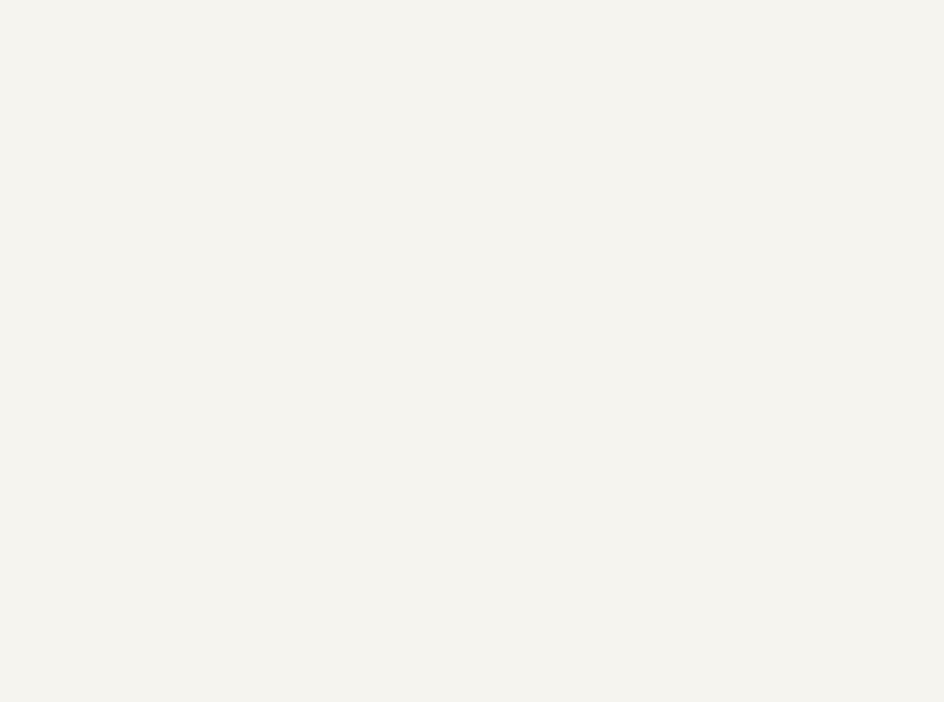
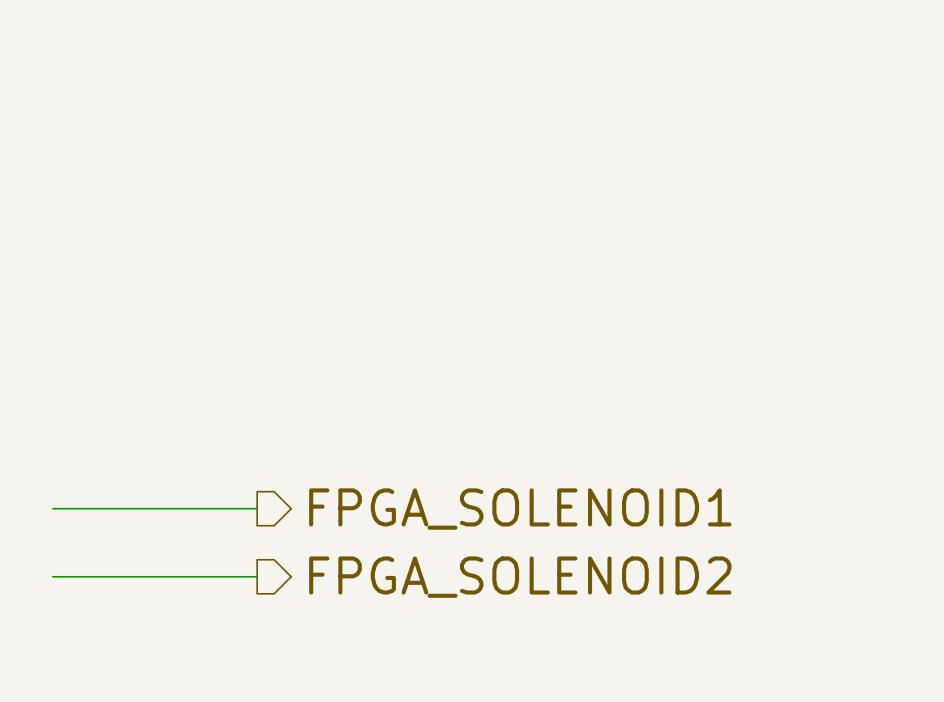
wire: none -> (52, 508) (257, 508)
hierarchical label: none -> FPGA_SOLENOID1 (520, 509)
wire: none -> (52, 576) (257, 576)
hierarchical label: none -> FPGA_SOLENOID2 (520, 577)

